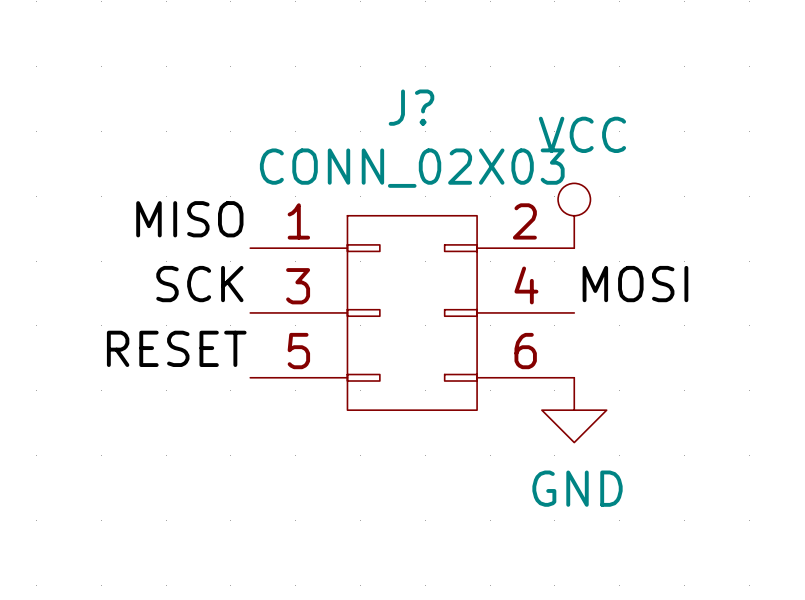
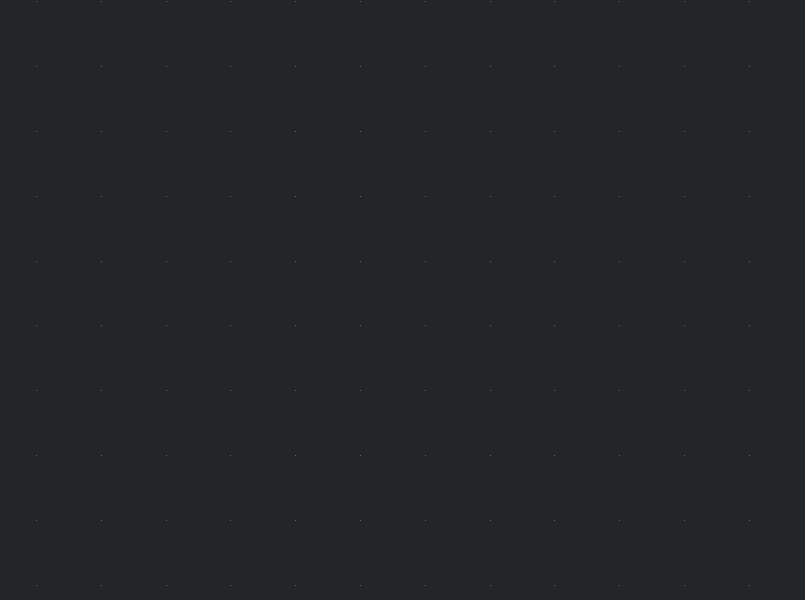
power symbol: VCC (574, 215) -> none
label: MISO (189, 219) -> none
label: SCK (199, 284) -> none
label: MOSI (635, 284) -> none
J?: CONN_02X03 (412, 312) -> none
label: RESET (176, 348) -> none
power symbol: GND (574, 410) -> none

